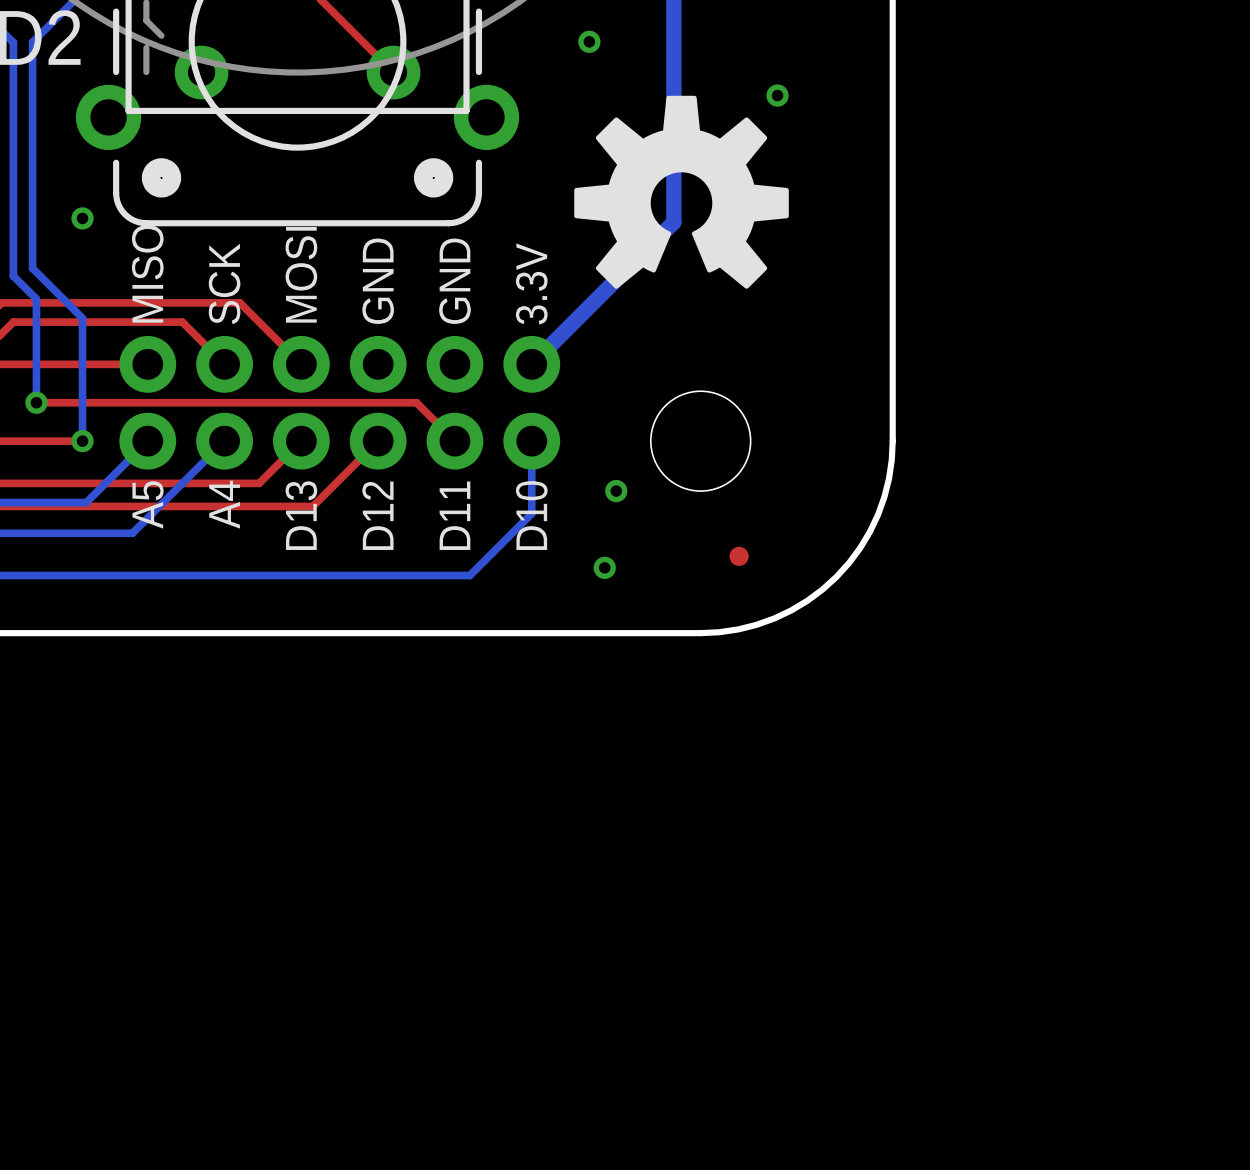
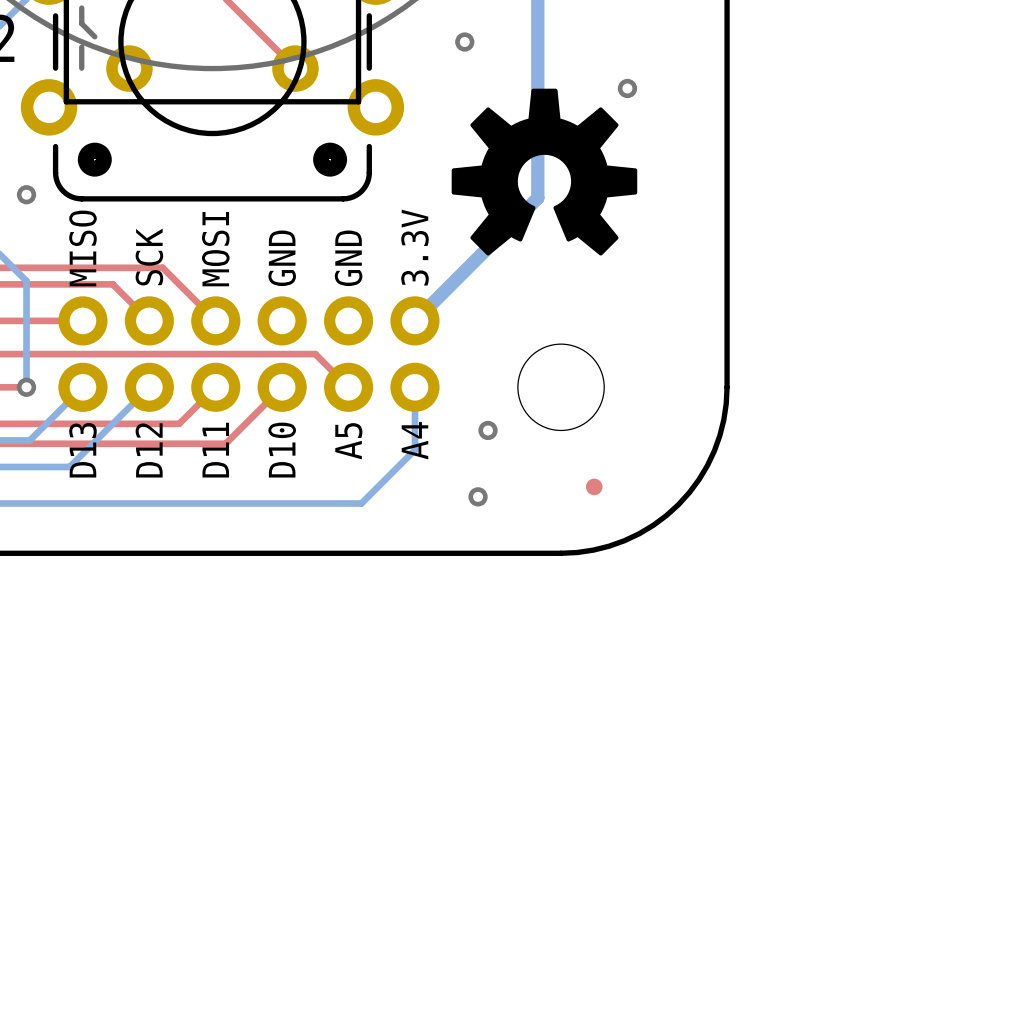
text: A5 (148, 504) -> D13 (82, 450)
text: A4 (224, 504) -> D12 (149, 450)
text: D13 (301, 515) -> D11 (215, 450)
text: D12 (377, 515) -> D10 (282, 450)
text: D11 (454, 515) -> A5 (348, 441)
text: D10 (531, 515) -> A4 (414, 440)

